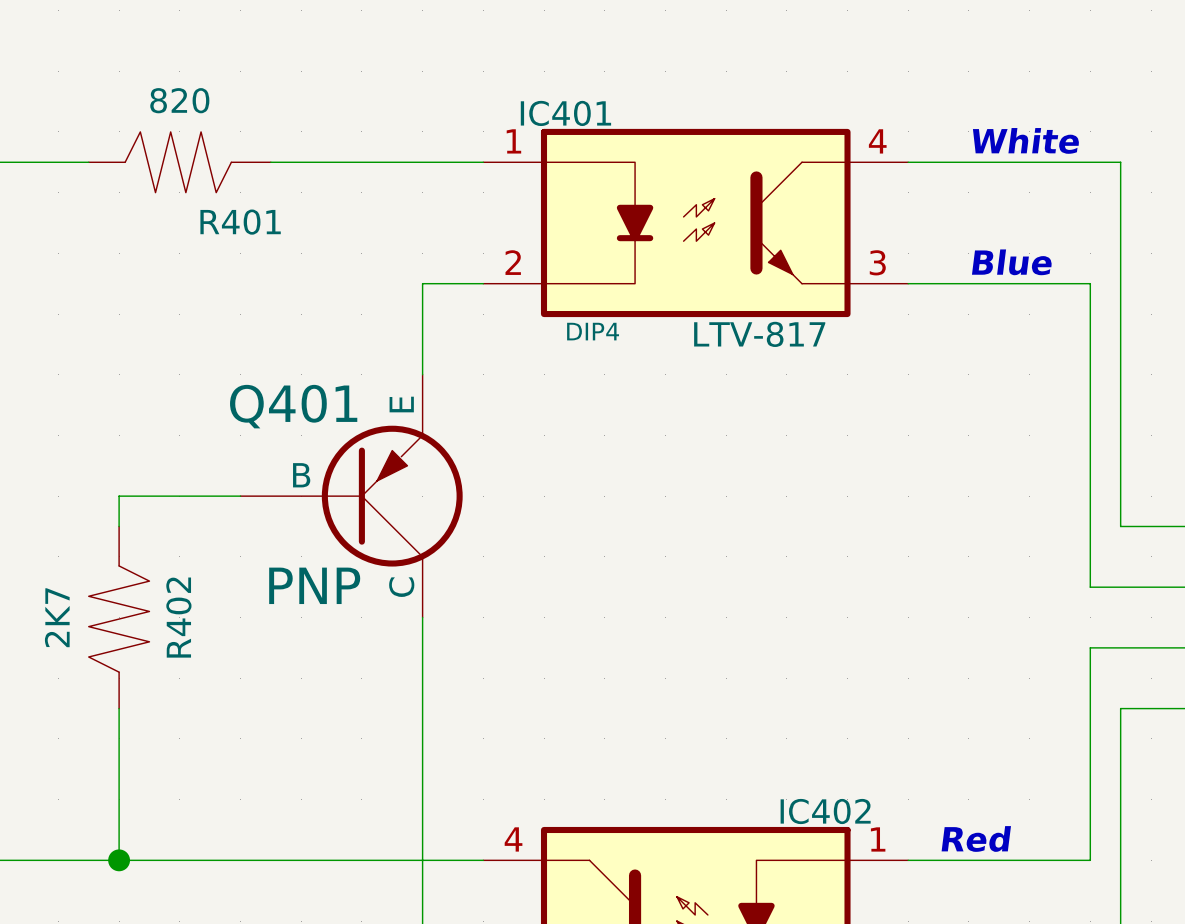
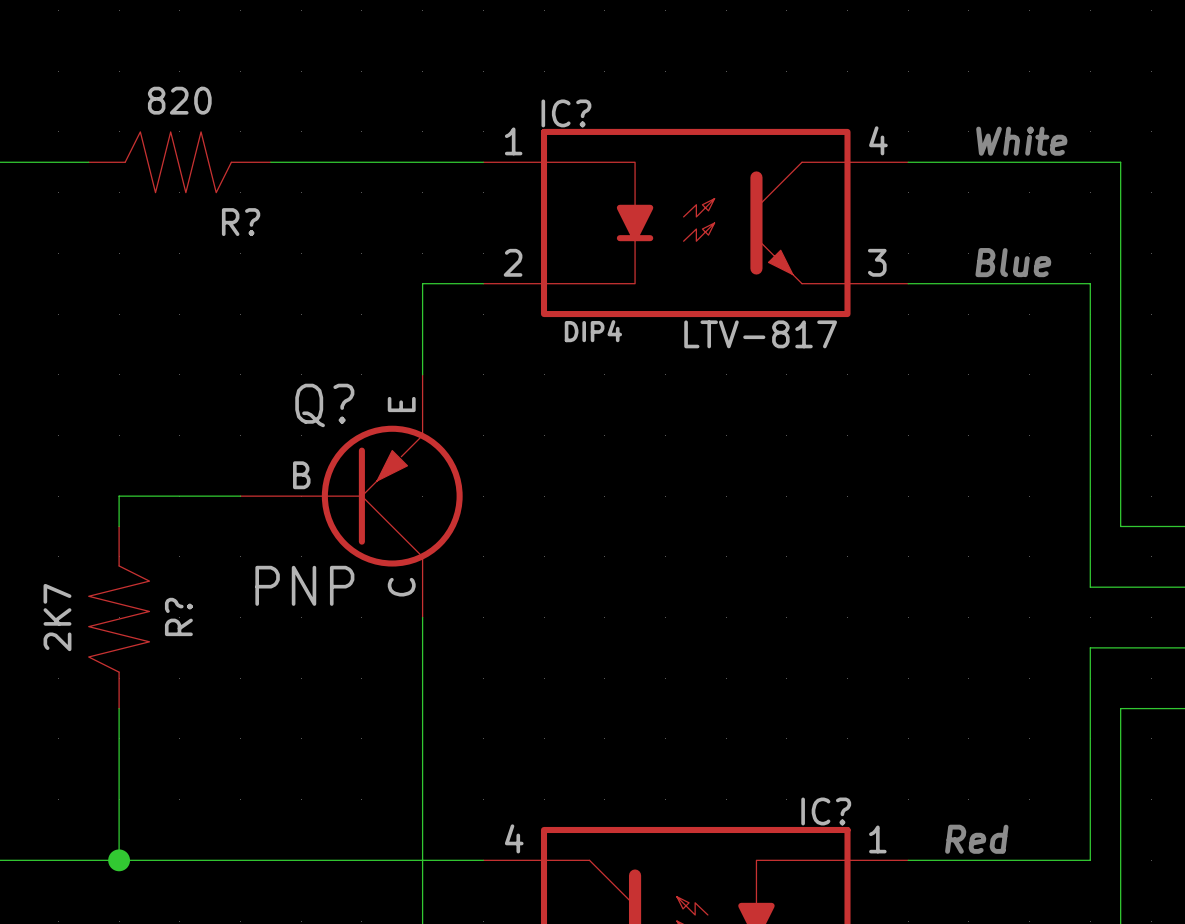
IC401 name: IC401 (565, 113) -> IC? (566, 113)
R401 name: R401 (240, 222) -> R? (241, 222)
Q401 name: Q401 (293, 406) -> Q? (324, 405)
R402 name: R402 (178, 617) -> R? (178, 616)
IC402 name: IC402 (825, 811) -> IC? (826, 811)

